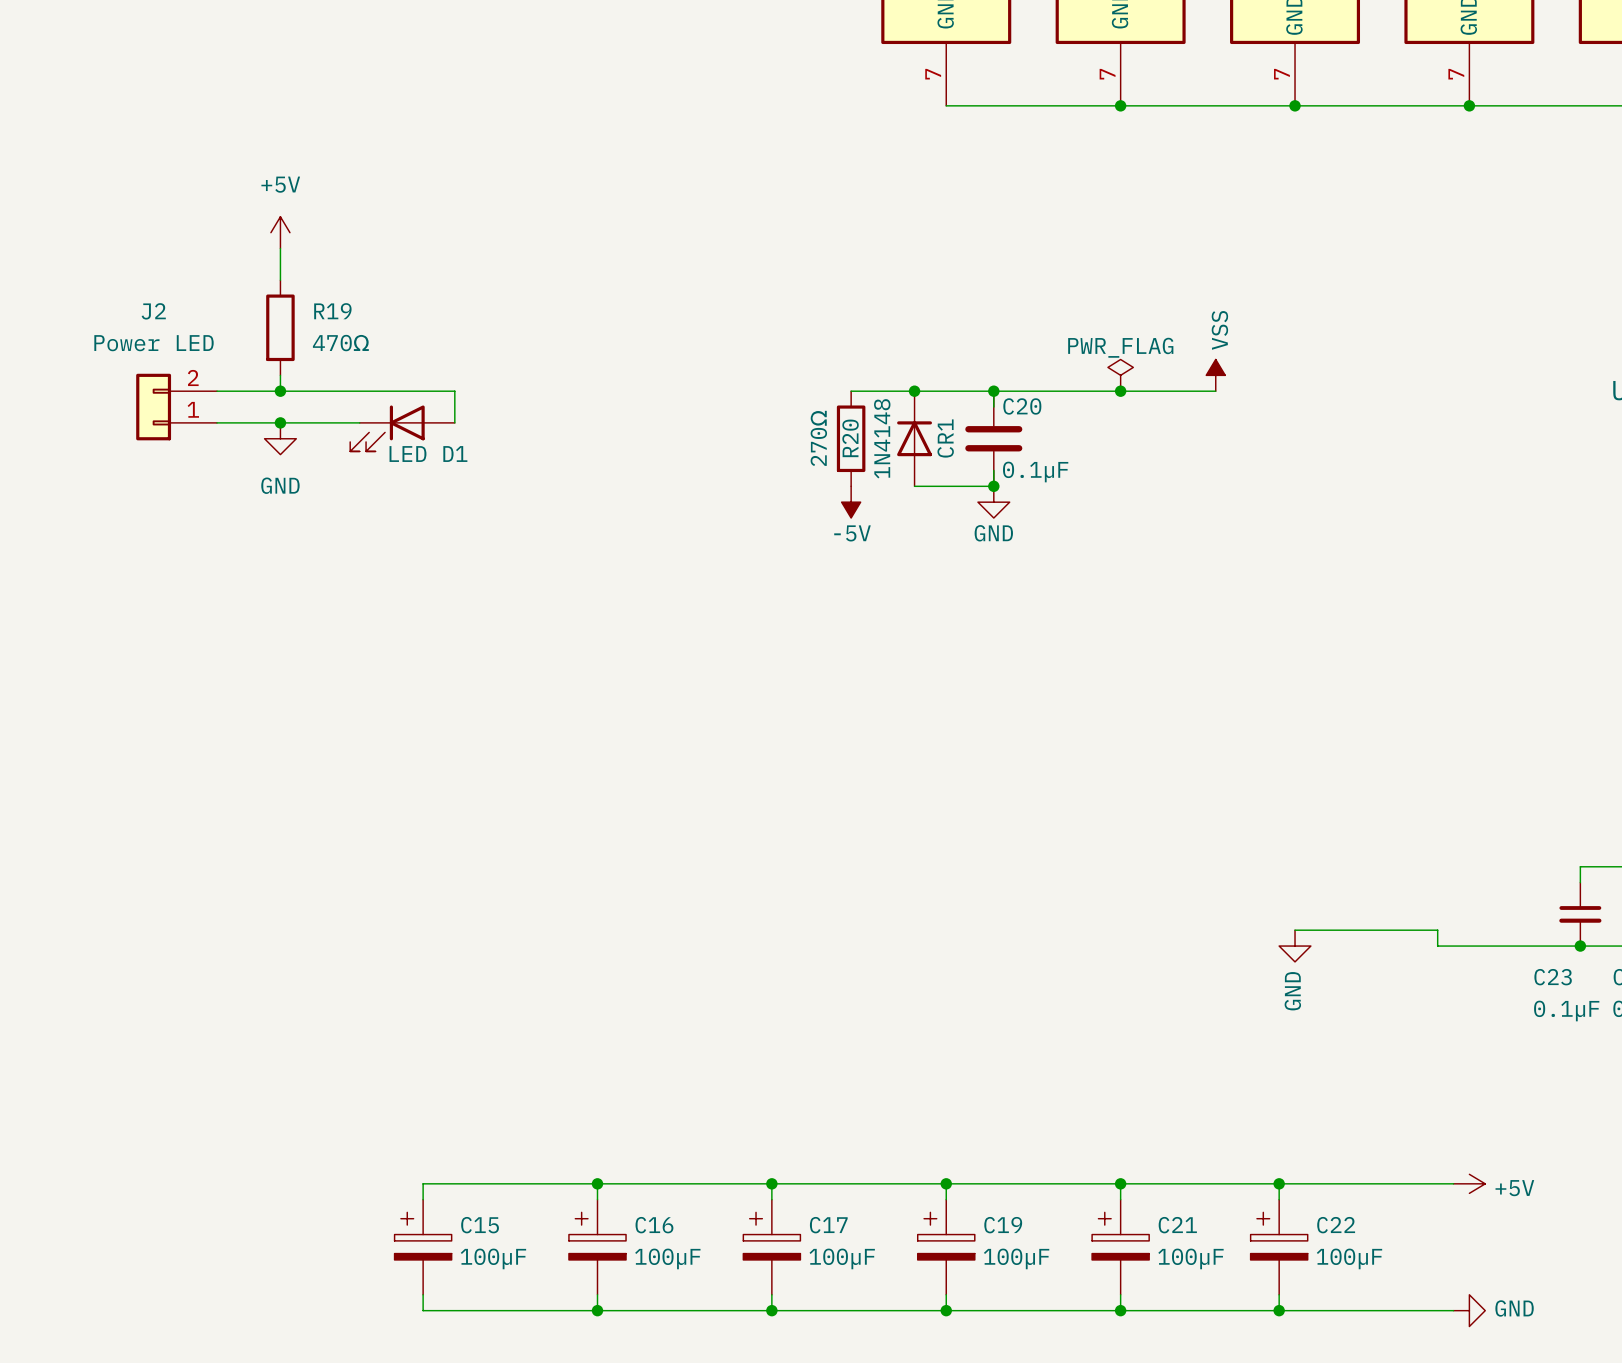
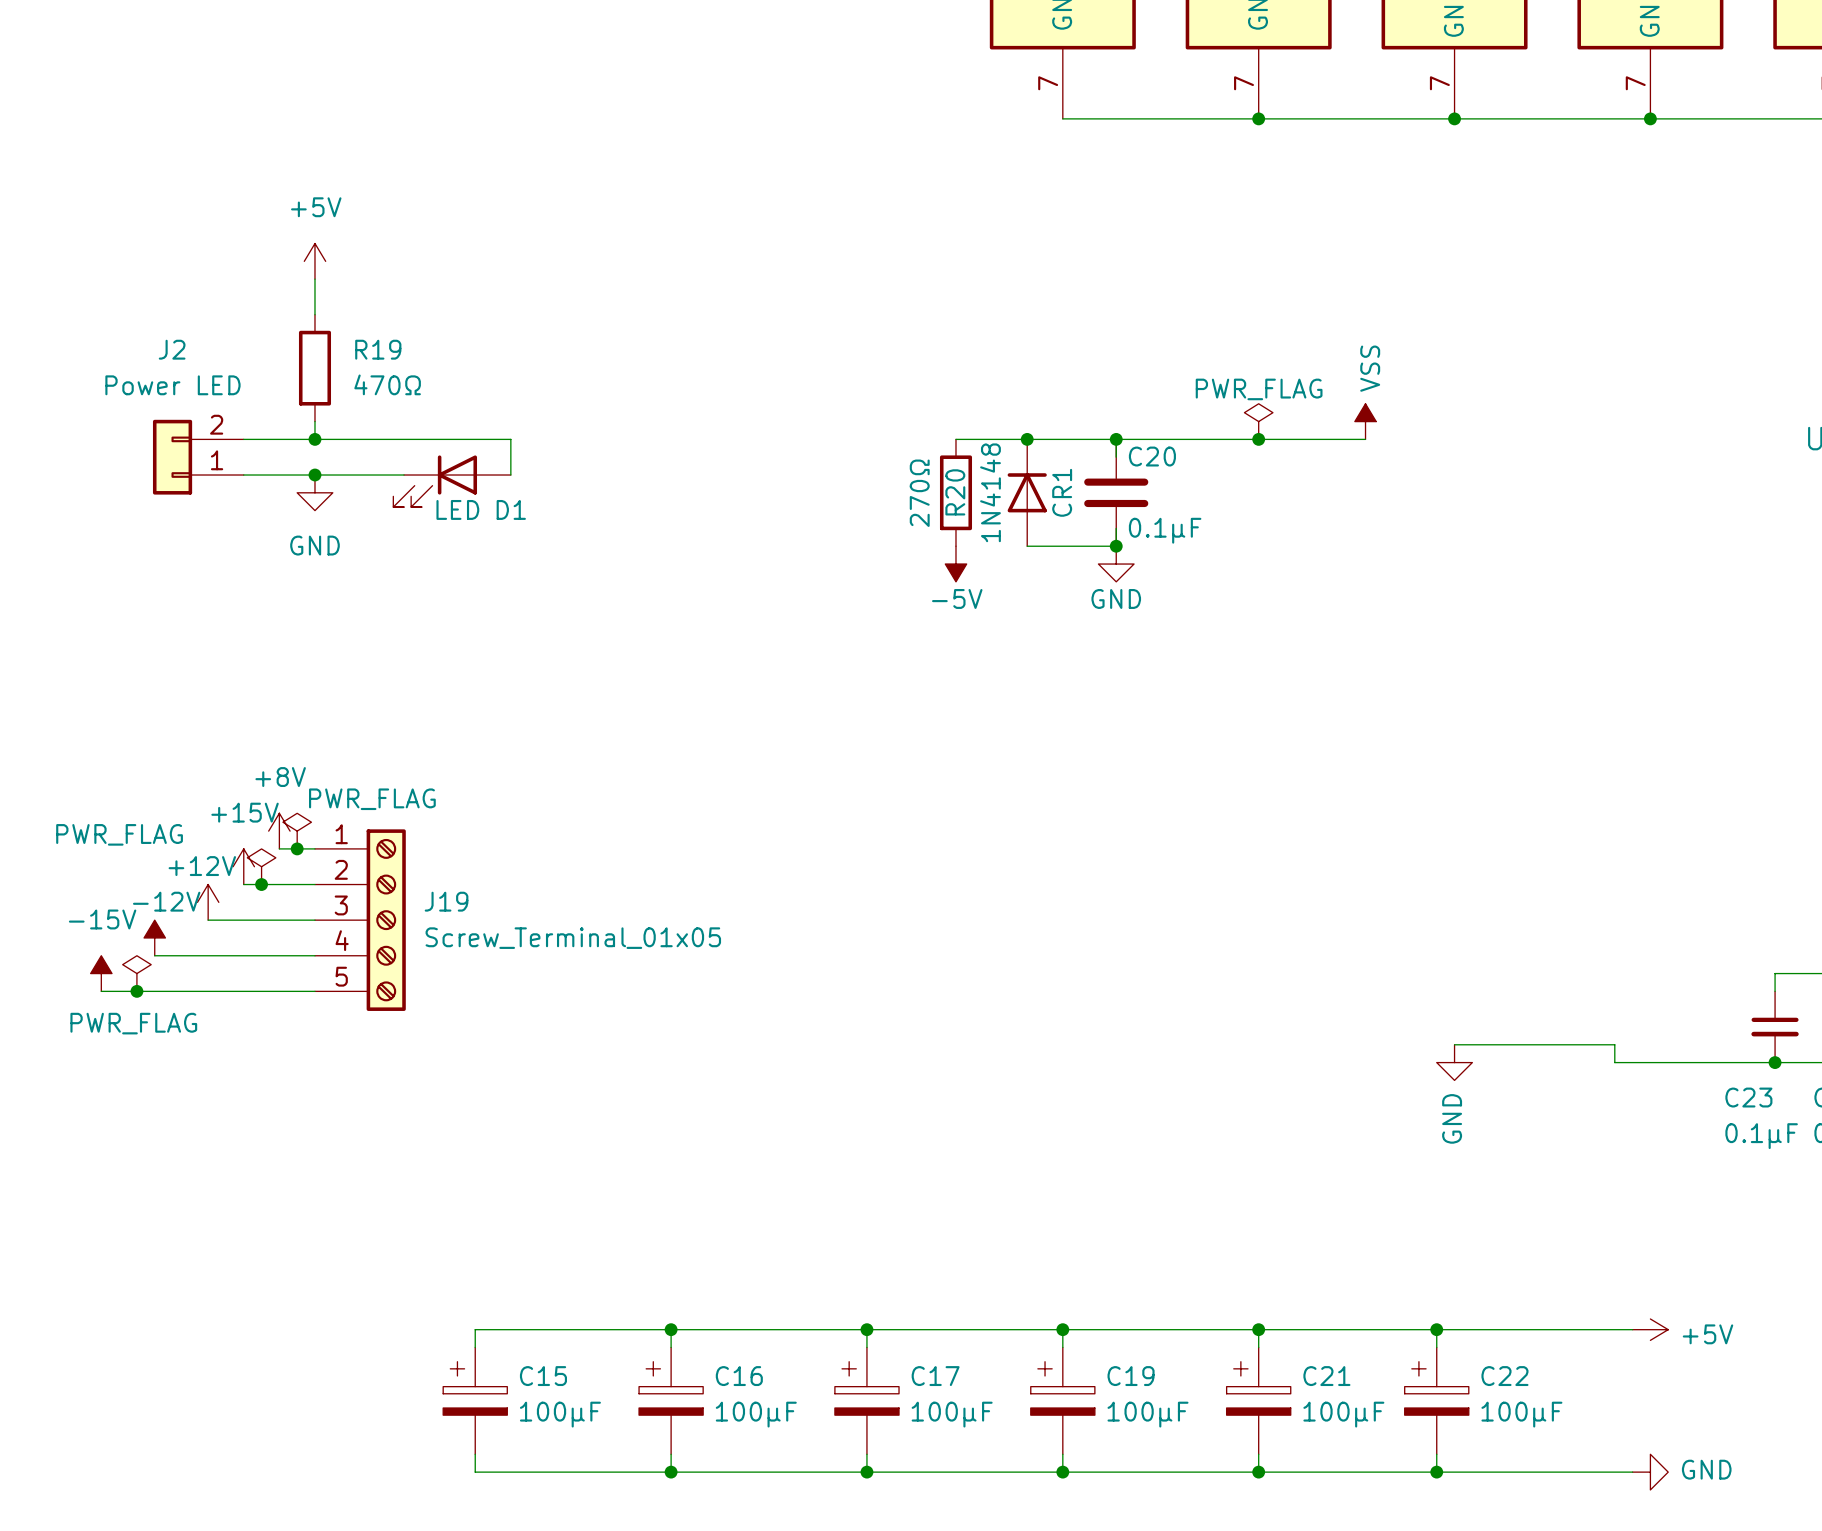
power symbol: none -> +8V (279, 831)
power symbol: none -> PWR_FLAG (297, 831)
wire: none -> (279, 848) (314, 848)
junction: none -> (297, 848)
power symbol: none -> +15V (243, 866)
power symbol: none -> PWR_FLAG (261, 866)
wire: none -> (243, 884) (314, 884)
junction: none -> (261, 884)
power symbol: none -> +12V (208, 902)
wire: none -> (208, 920) (314, 920)
J19: none -> Screw_Terminal_01x05 (360, 920)
power symbol: none -> -12V (154, 937)
wire: none -> (154, 955) (314, 955)
power symbol: none -> -15V (101, 973)
power symbol: none -> PWR_FLAG (136, 973)
wire: none -> (101, 991) (314, 991)
junction: none -> (136, 991)

